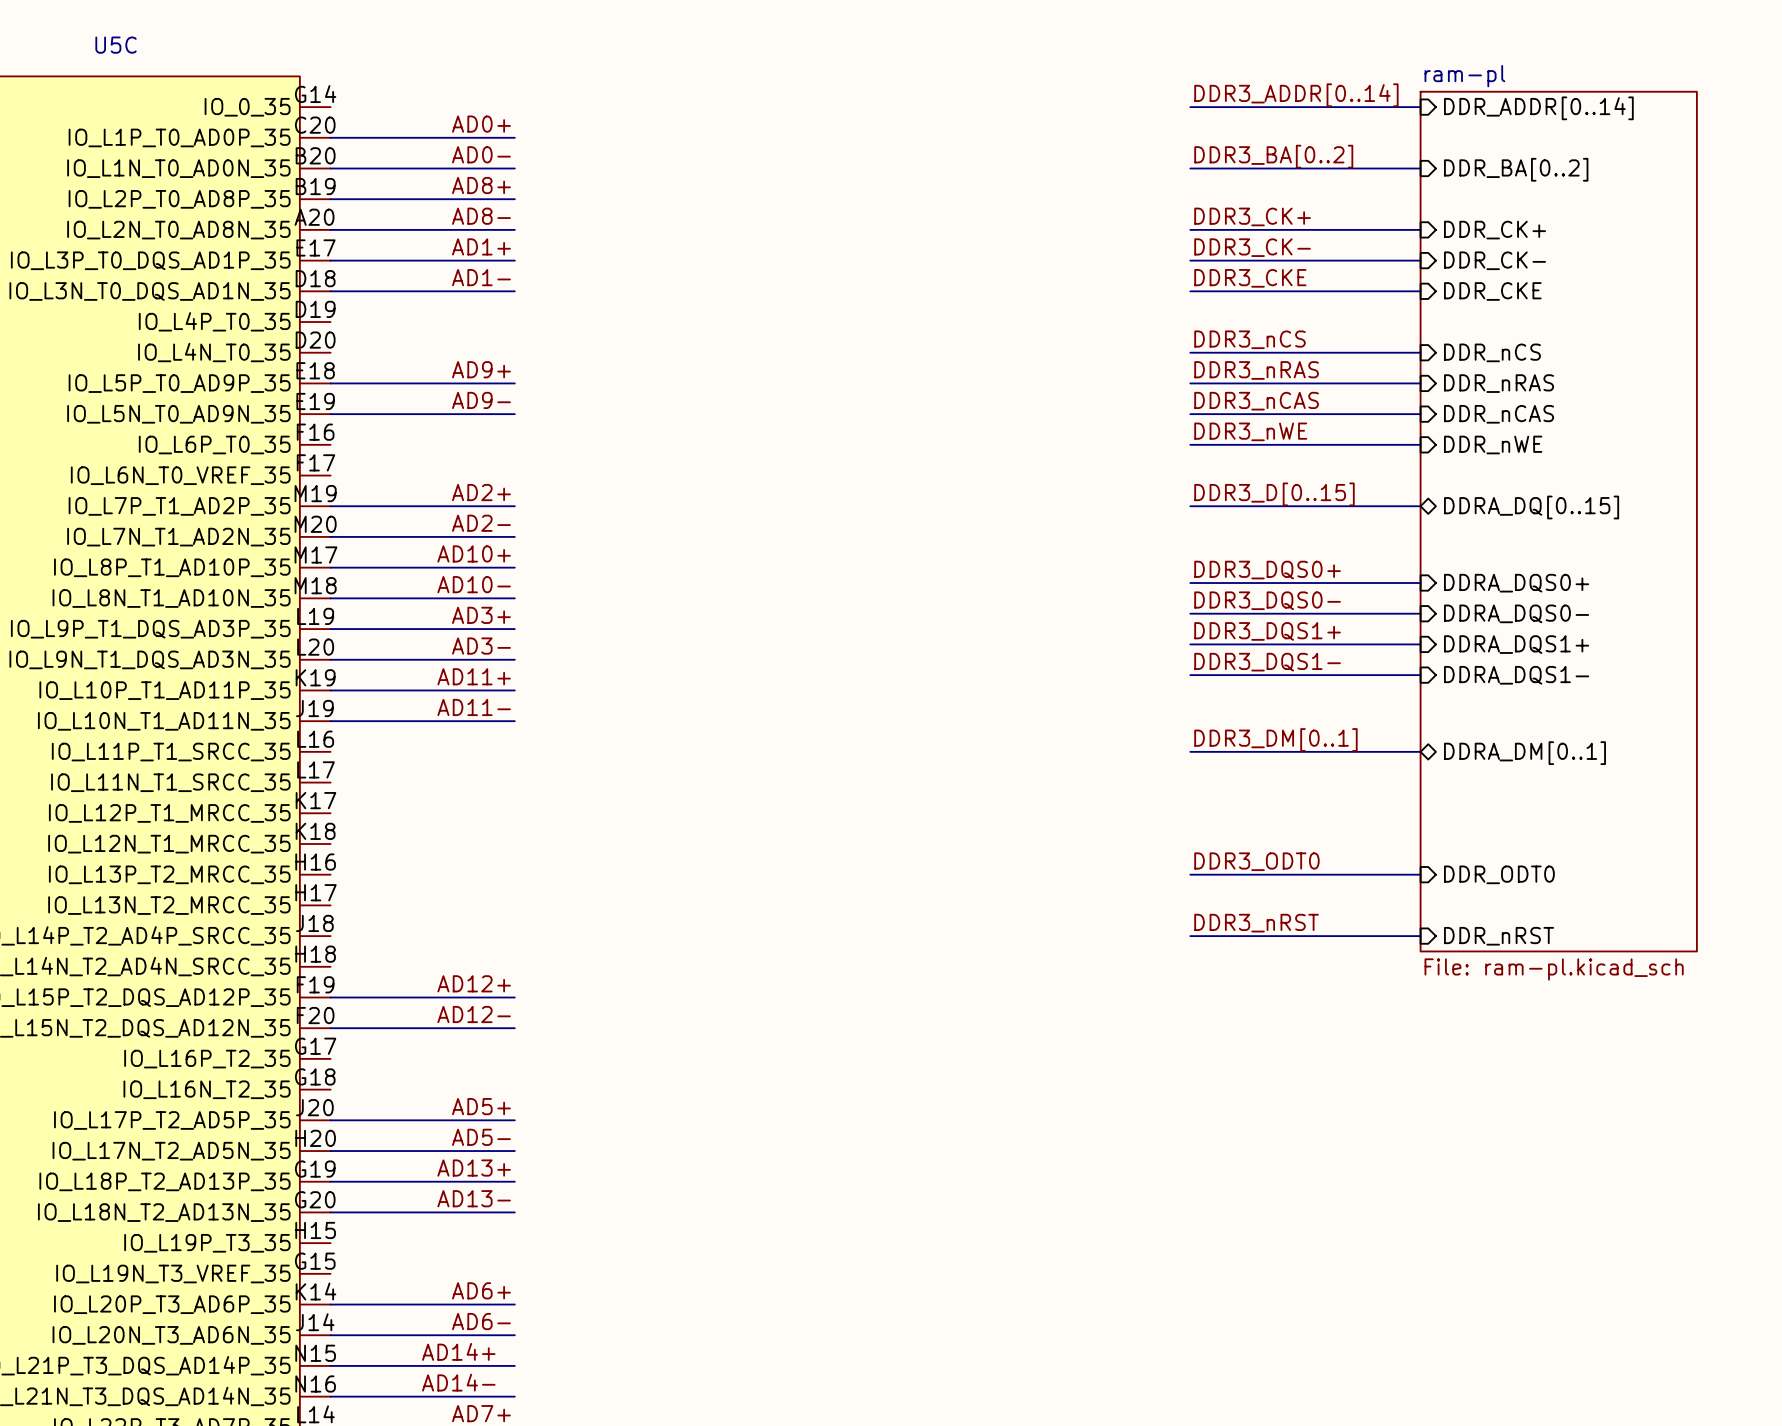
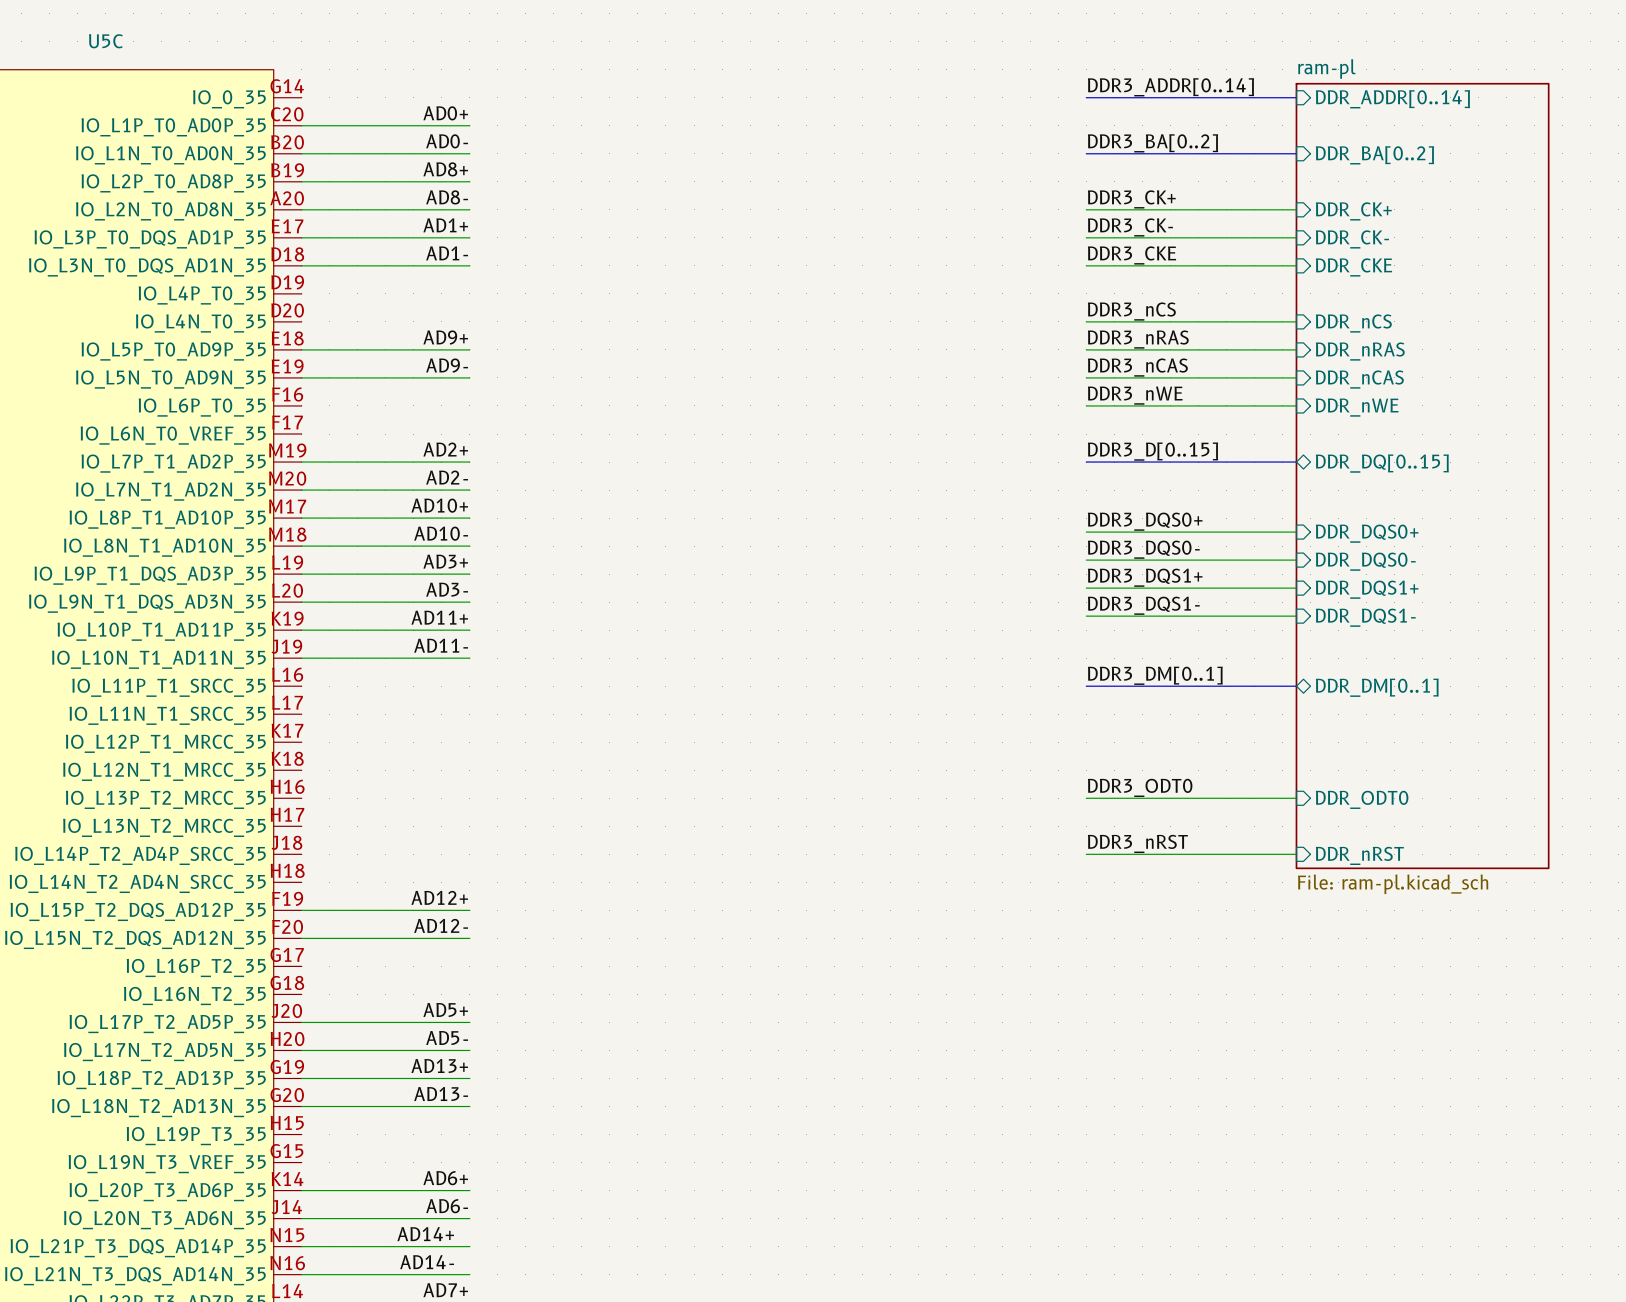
sheet pin: DDRA_DQ[0..15] (1531, 507) -> DDR_DQ[0..15] (1382, 463)
sheet pin: DDRA_DQS0+ (1516, 583) -> DDR_DQS0+ (1367, 533)
sheet pin: DDRA_DQS0- (1516, 613) -> DDR_DQS0- (1365, 561)
sheet pin: DDRA_DQS1+ (1516, 644) -> DDR_DQS1+ (1367, 589)
sheet pin: DDRA_DQS1- (1516, 675) -> DDR_DQS1- (1365, 617)
sheet pin: DDRA_DM[0..1] (1524, 753) -> DDR_DM[0..1] (1377, 687)

